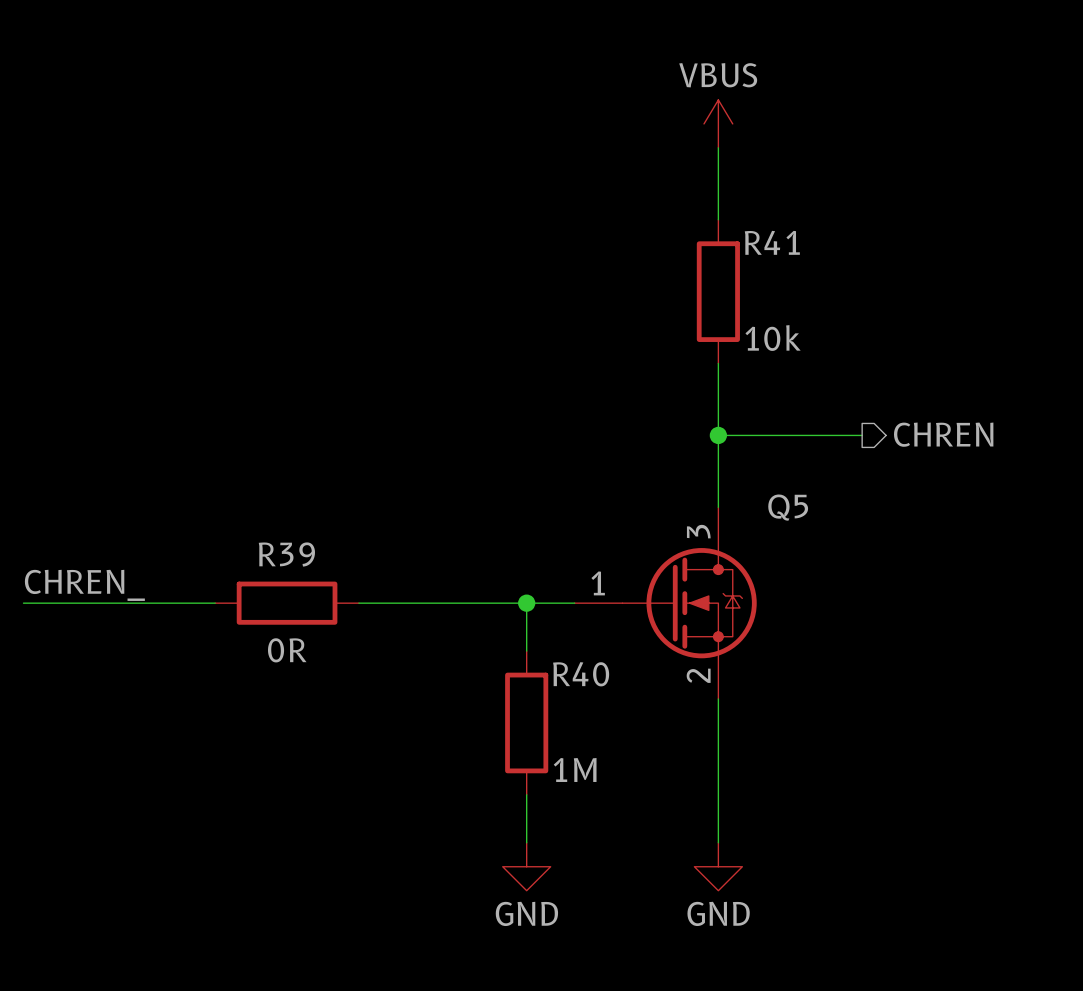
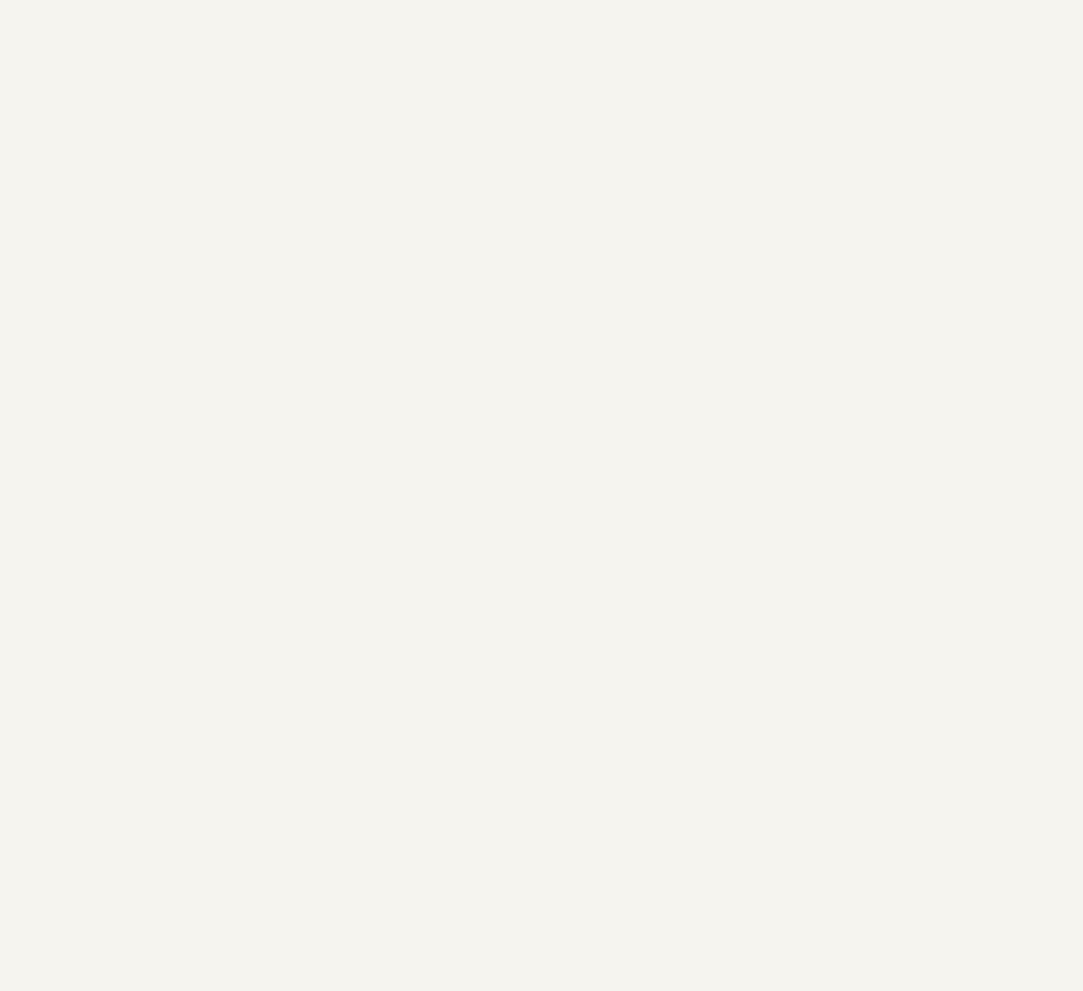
power symbol: VBUS (718, 123) -> none
wire: (718, 147) (718, 219) -> none
R41: 10k (718, 291) -> none
wire: (718, 363) (718, 507) -> none
hierarchical label: CHREN (943, 434) -> none
wire: (718, 435) (862, 435) -> none
junction: (718, 435) -> none
label: CHREN_ (84, 585) -> none
wire: (23, 603) (215, 603) -> none
R39: 0R (287, 603) -> none
wire: (358, 603) (574, 603) -> none
wire: (526, 603) (526, 651) -> none
junction: (526, 603) -> none
Q5: (665, 603) -> none
wire: (718, 699) (718, 842) -> none
R40: 1M (526, 722) -> none
wire: (526, 794) (526, 842) -> none
power symbol: GND (526, 866) -> none
power symbol: GND (718, 866) -> none

